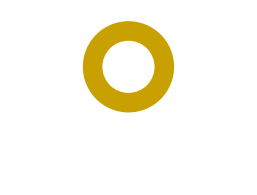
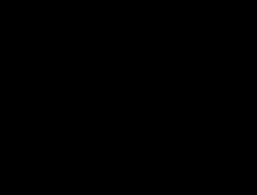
part: (128, 66) -> none

